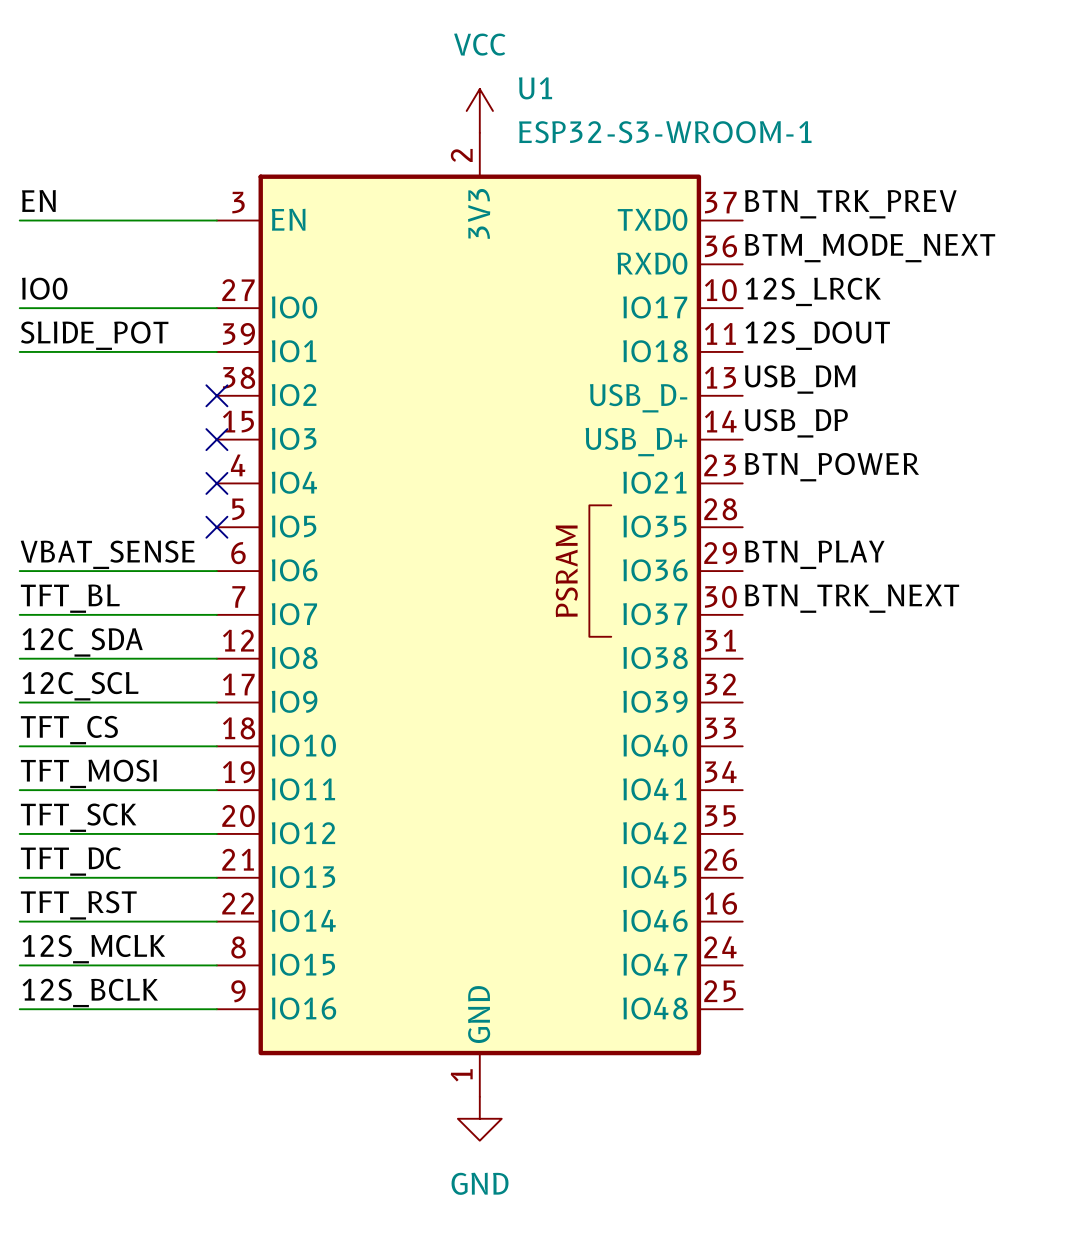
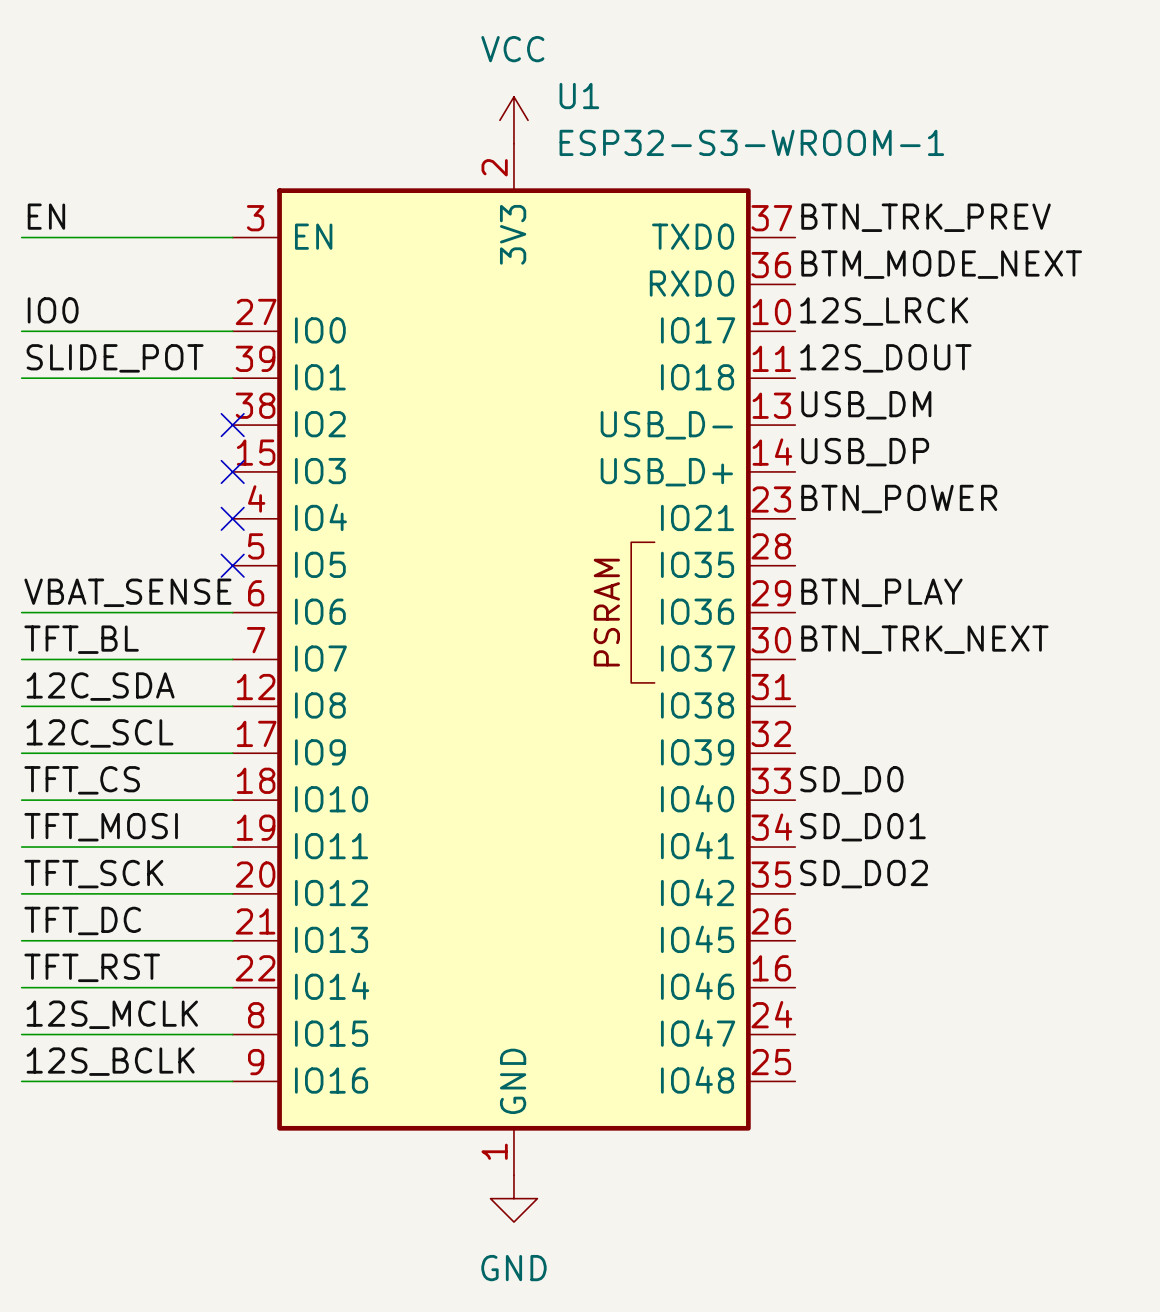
label: none -> SD_D0 (851, 780)
label: none -> SD_D01 (862, 827)
label: none -> SD_DO2 (864, 874)

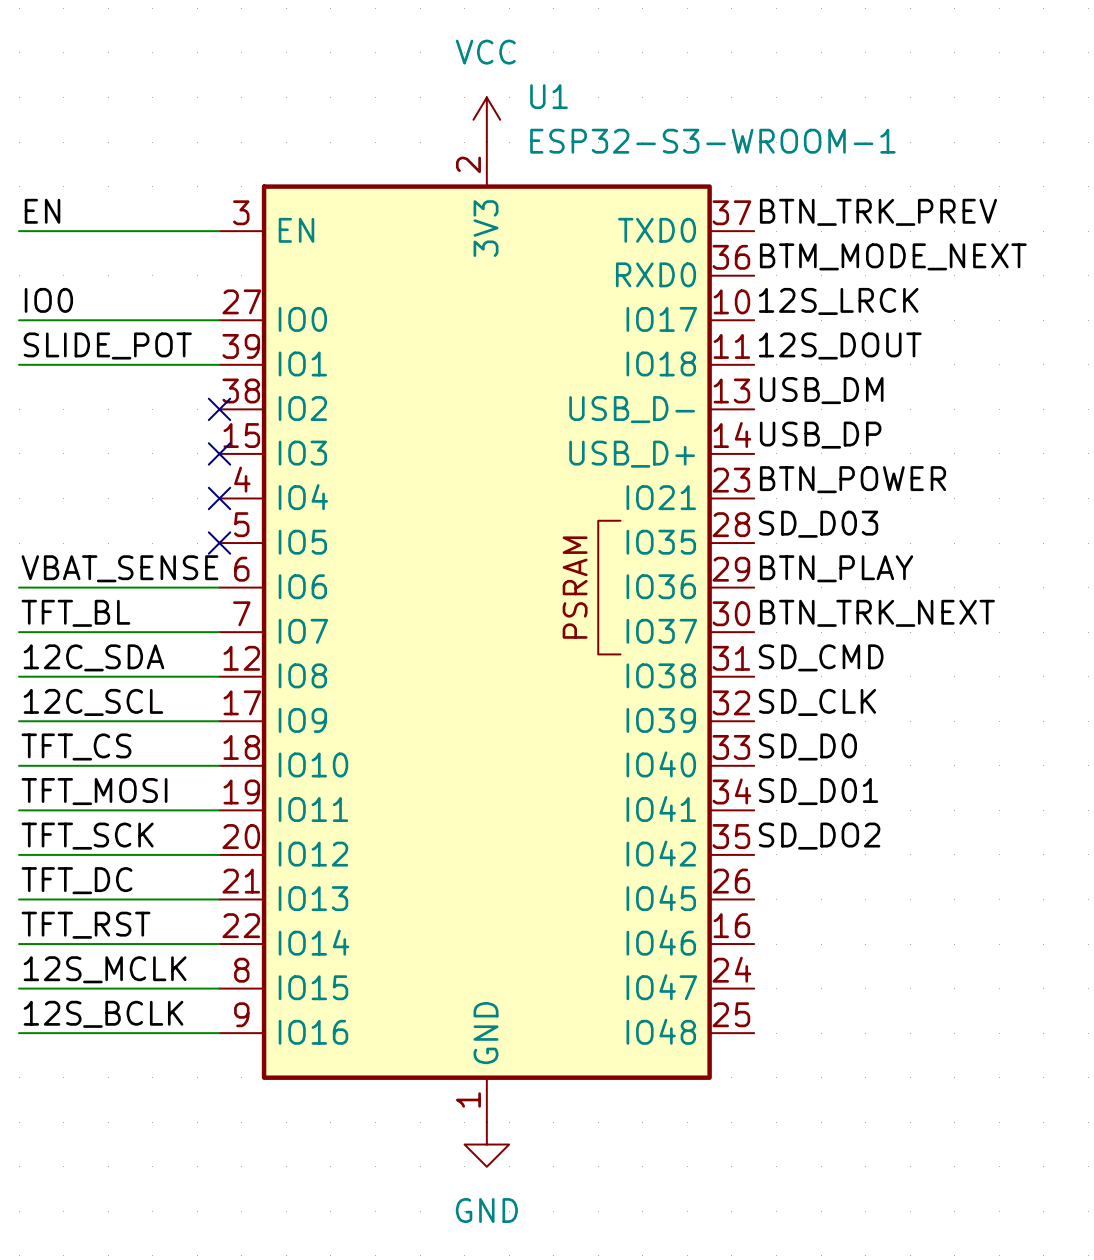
label: none -> SD_D03 (818, 524)
label: none -> SD_CMD (821, 657)
label: none -> SD_CLK (817, 702)

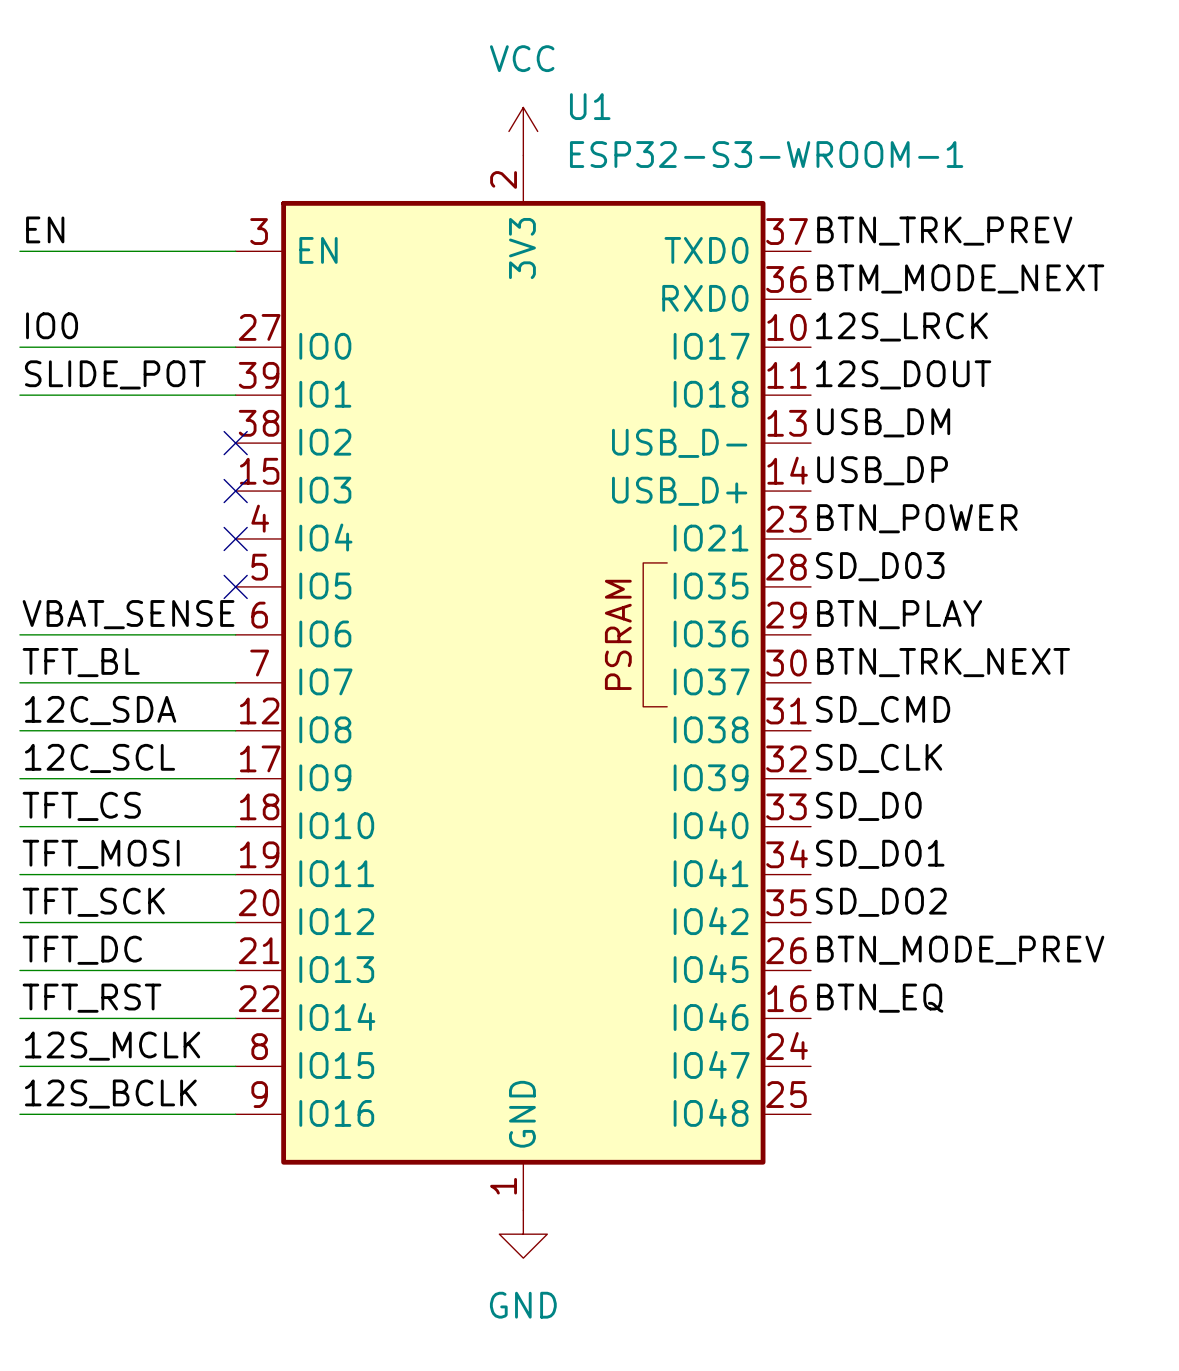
label: none -> BTN_MODE_PREV (960, 950)
label: none -> BTN_EQ (880, 998)

